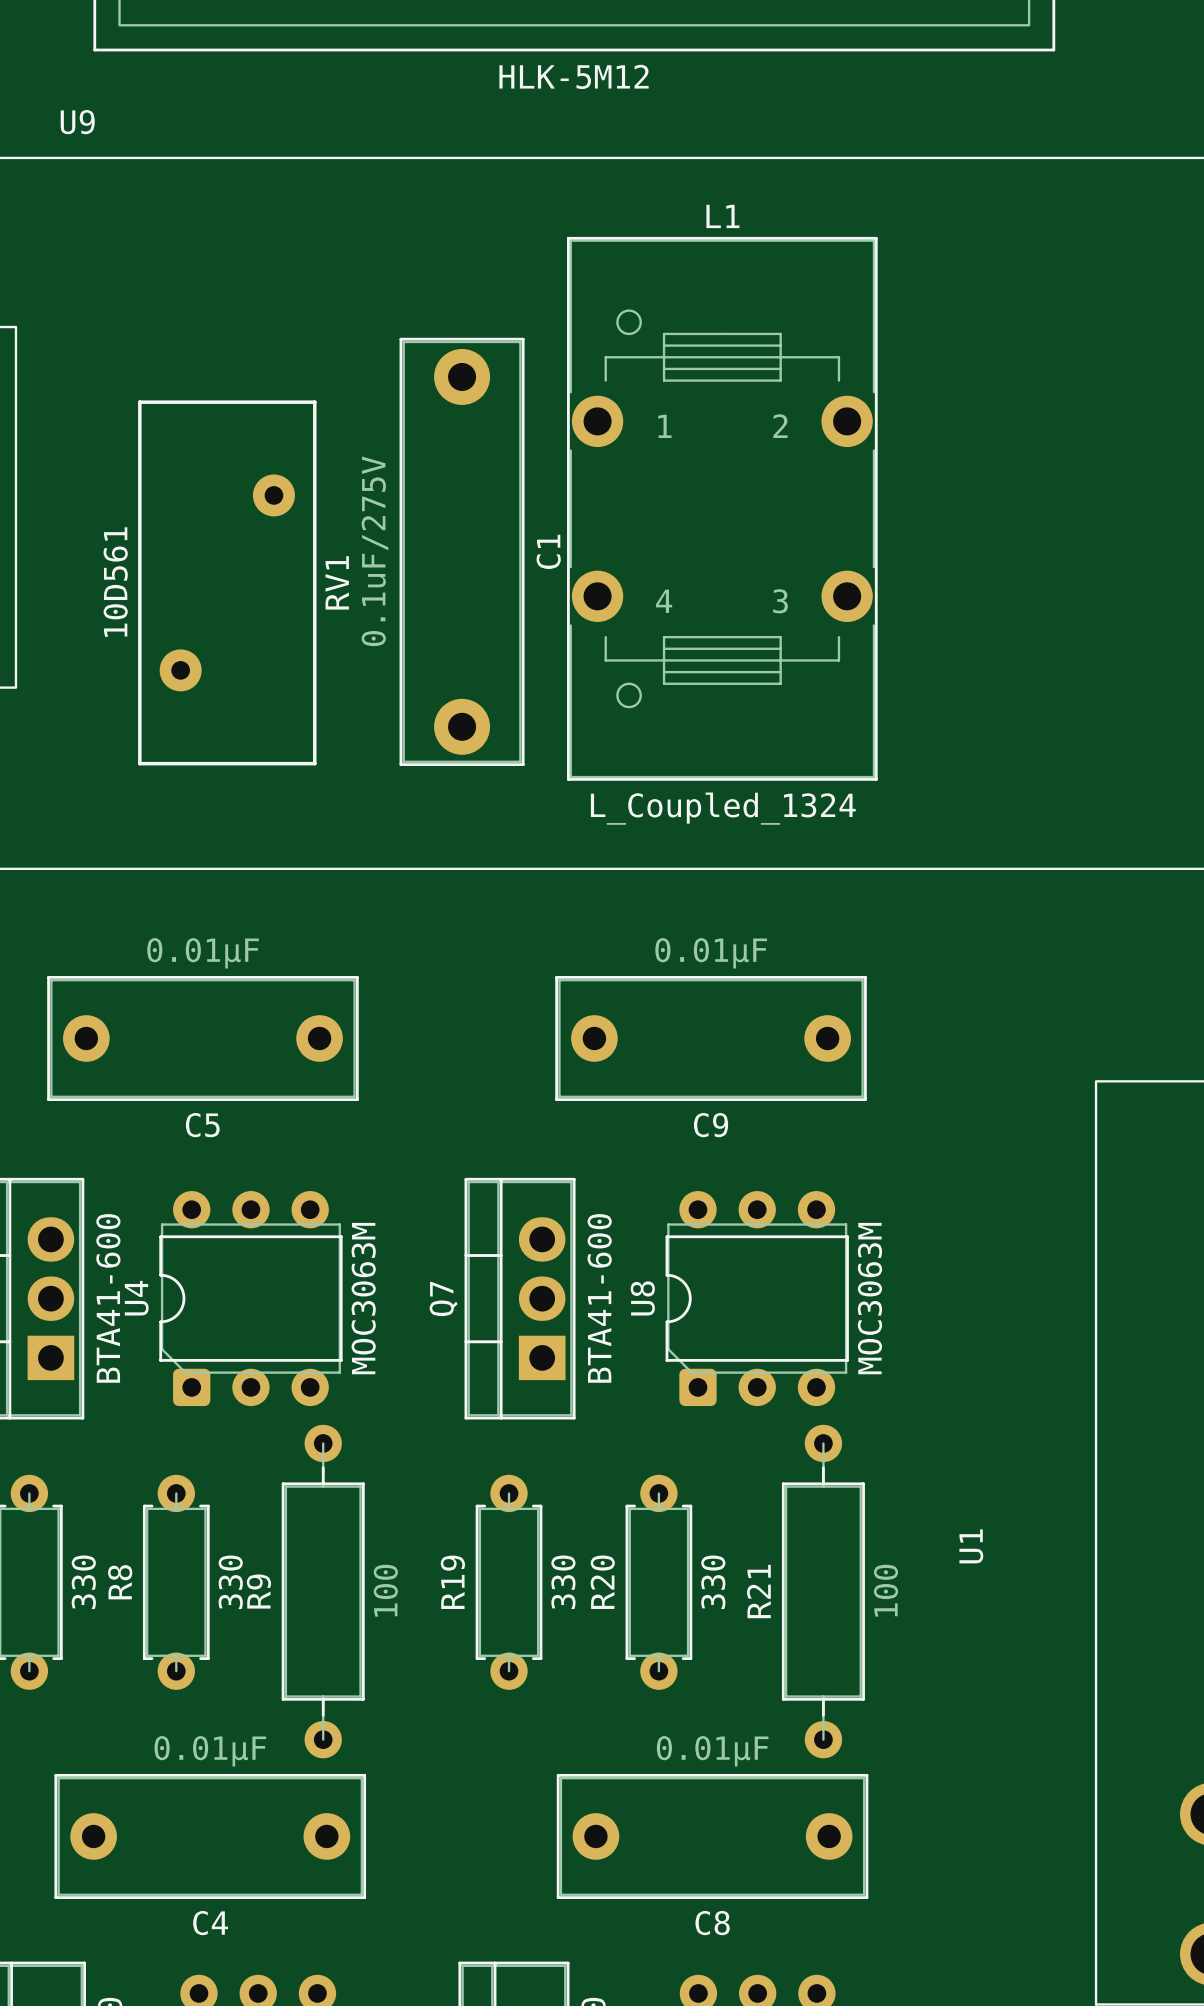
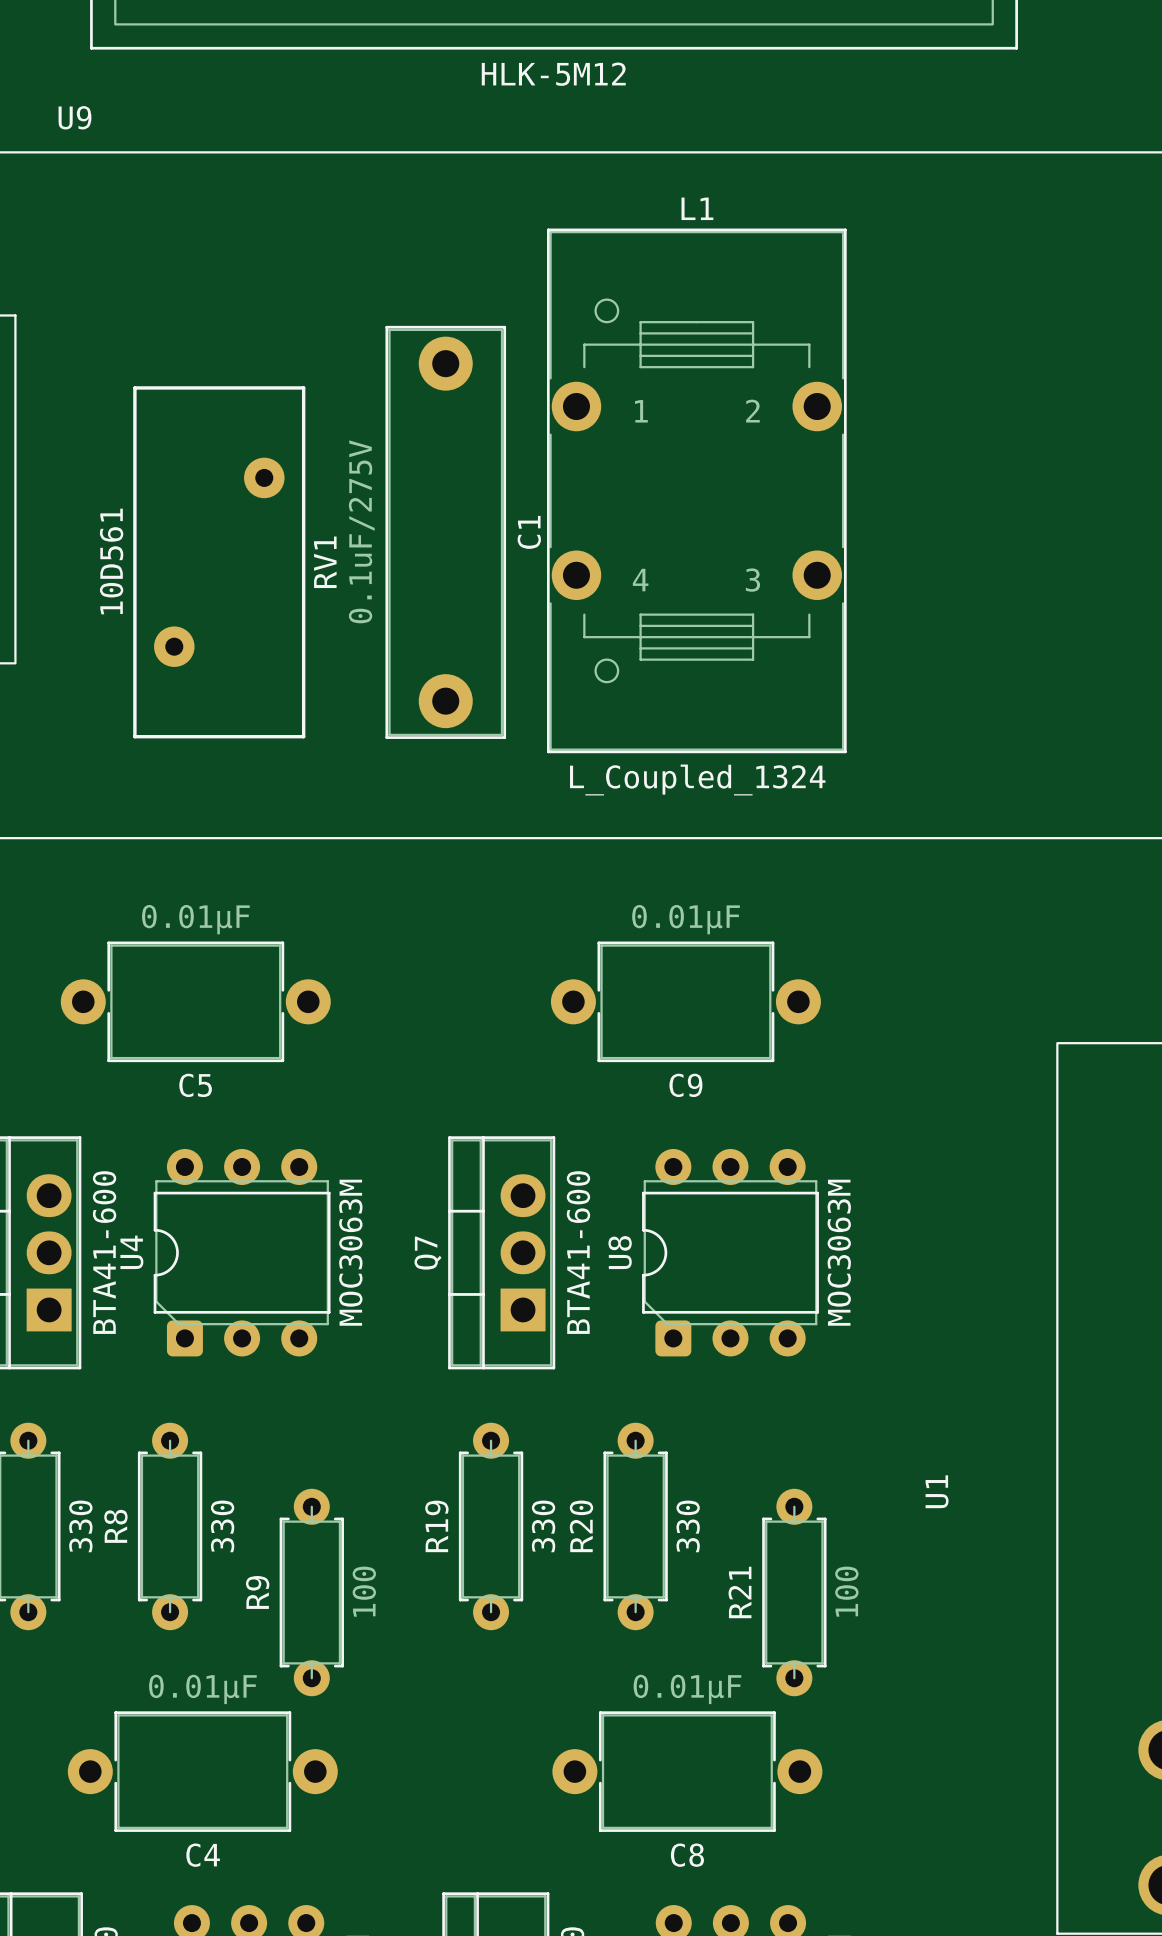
C5 footprint: [47, 975, 359, 1102] -> [60, 941, 331, 1063]
C9 footprint: [555, 975, 867, 1102] -> [550, 941, 821, 1063]
R9 footprint: [281, 1424, 365, 1759] -> [279, 1488, 344, 1697]
R21 footprint: [781, 1424, 865, 1759] -> [762, 1488, 827, 1697]
C4 footprint: [54, 1773, 367, 1899] -> [67, 1711, 338, 1832]
C8 footprint: [556, 1773, 869, 1899] -> [552, 1711, 823, 1832]

